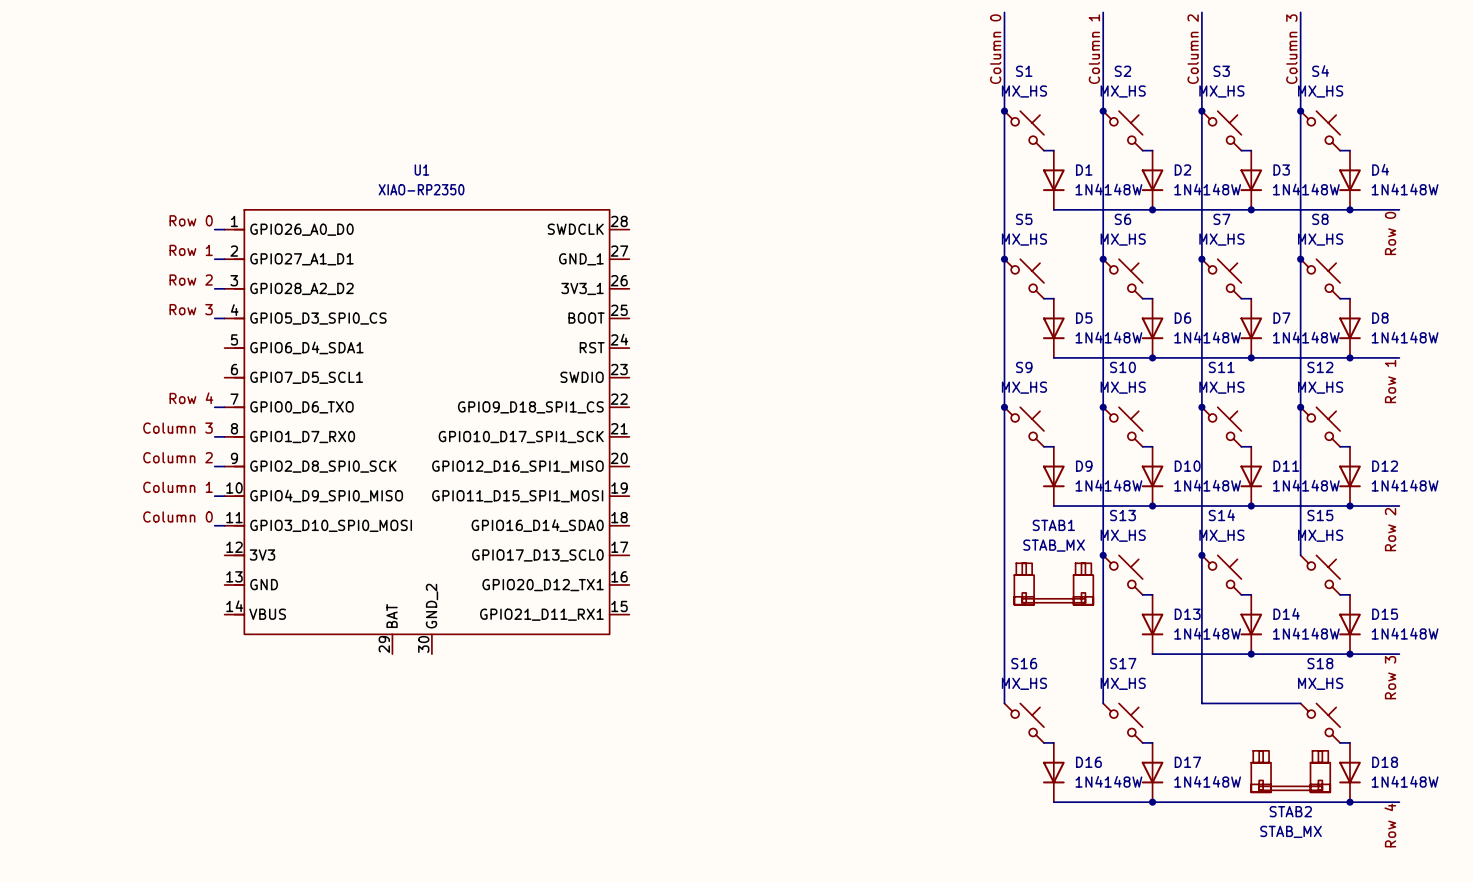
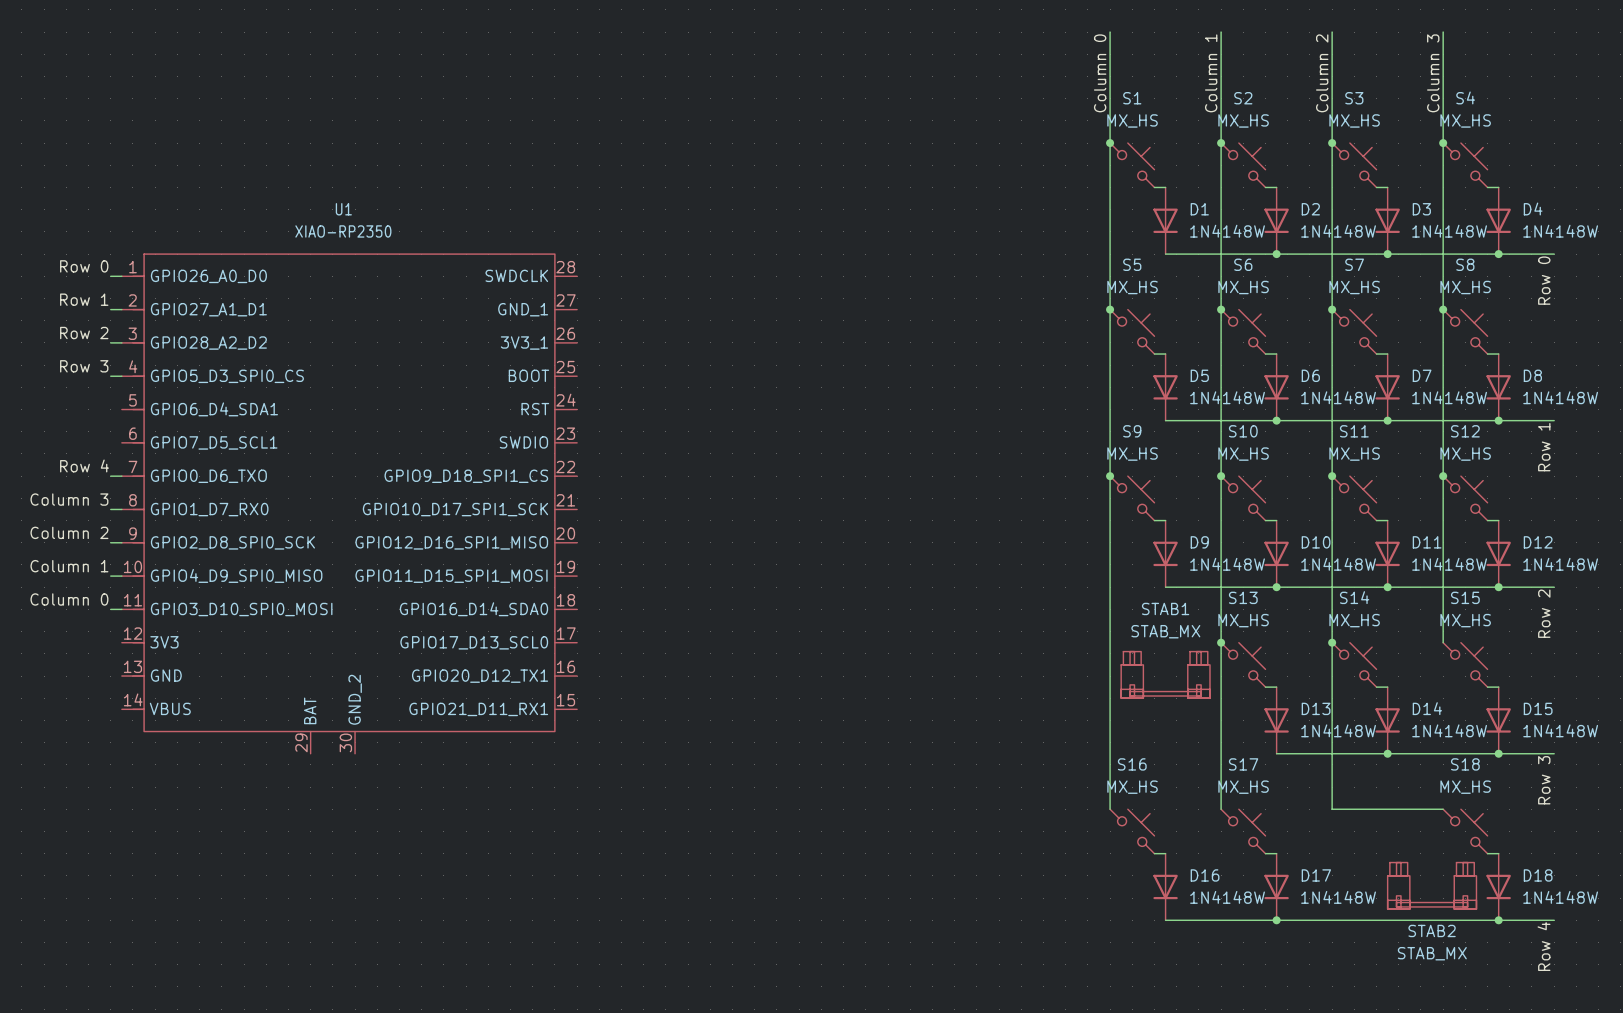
label position: Row 0 (191, 220) -> Row 0 (84, 266)
wire: (214, 229) (224, 229) -> (110, 276) (121, 276)
label position: Row 1 (191, 250) -> Row 1 (84, 299)
wire: (214, 259) (224, 259) -> (110, 309) (121, 309)
label position: Row 2 (191, 280) -> Row 2 (84, 333)
wire: (214, 288) (224, 288) -> (110, 342) (121, 342)
label position: Row 3 (191, 309) -> Row 3 (84, 366)
wire: (214, 318) (224, 318) -> (110, 376) (121, 376)
label position: Row 4 (191, 398) -> Row 4 (84, 465)
wire: (214, 407) (224, 407) -> (110, 476) (121, 476)
label position: Column 3 (177, 428) -> Column 3 (69, 499)
U1 position: (426, 431) -> (349, 503)
wire: (214, 436) (224, 436) -> (110, 509) (121, 509)
label position: Column 2 (177, 457) -> Column 2 (69, 532)
wire: (214, 466) (224, 466) -> (110, 542) (121, 542)
label position: Column 1 (177, 487) -> Column 1 (69, 566)
wire: (214, 496) (224, 496) -> (110, 576) (121, 576)
label position: Column 0 (177, 516) -> Column 0 (69, 599)
wire: (214, 525) (224, 525) -> (110, 609) (121, 609)

